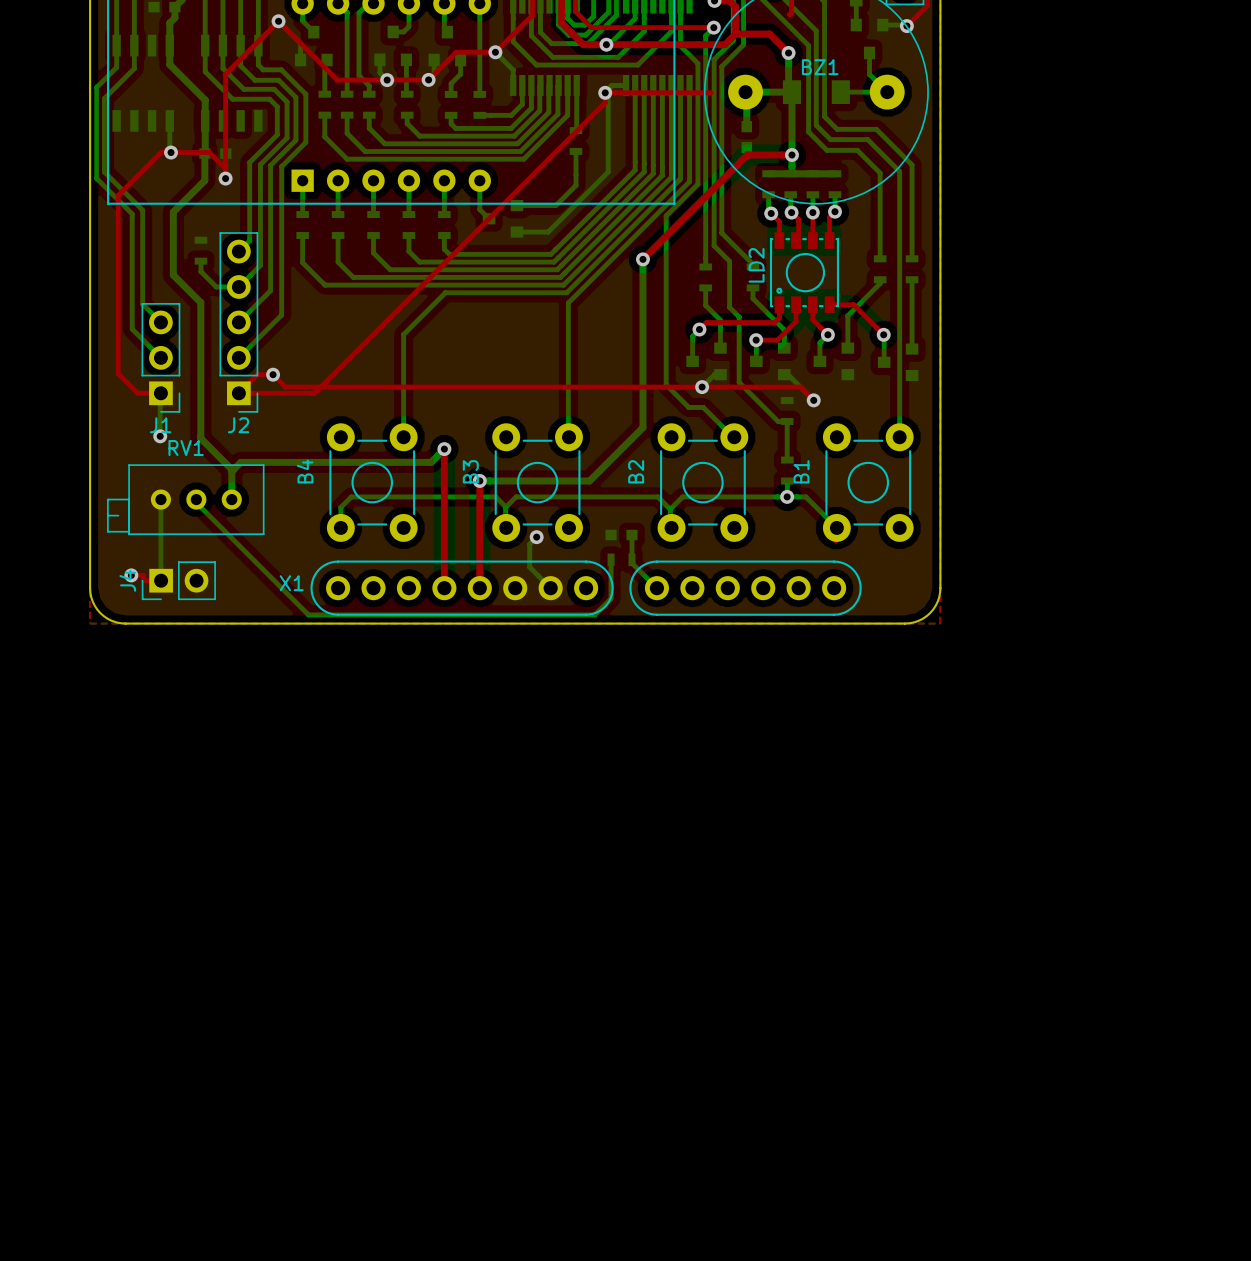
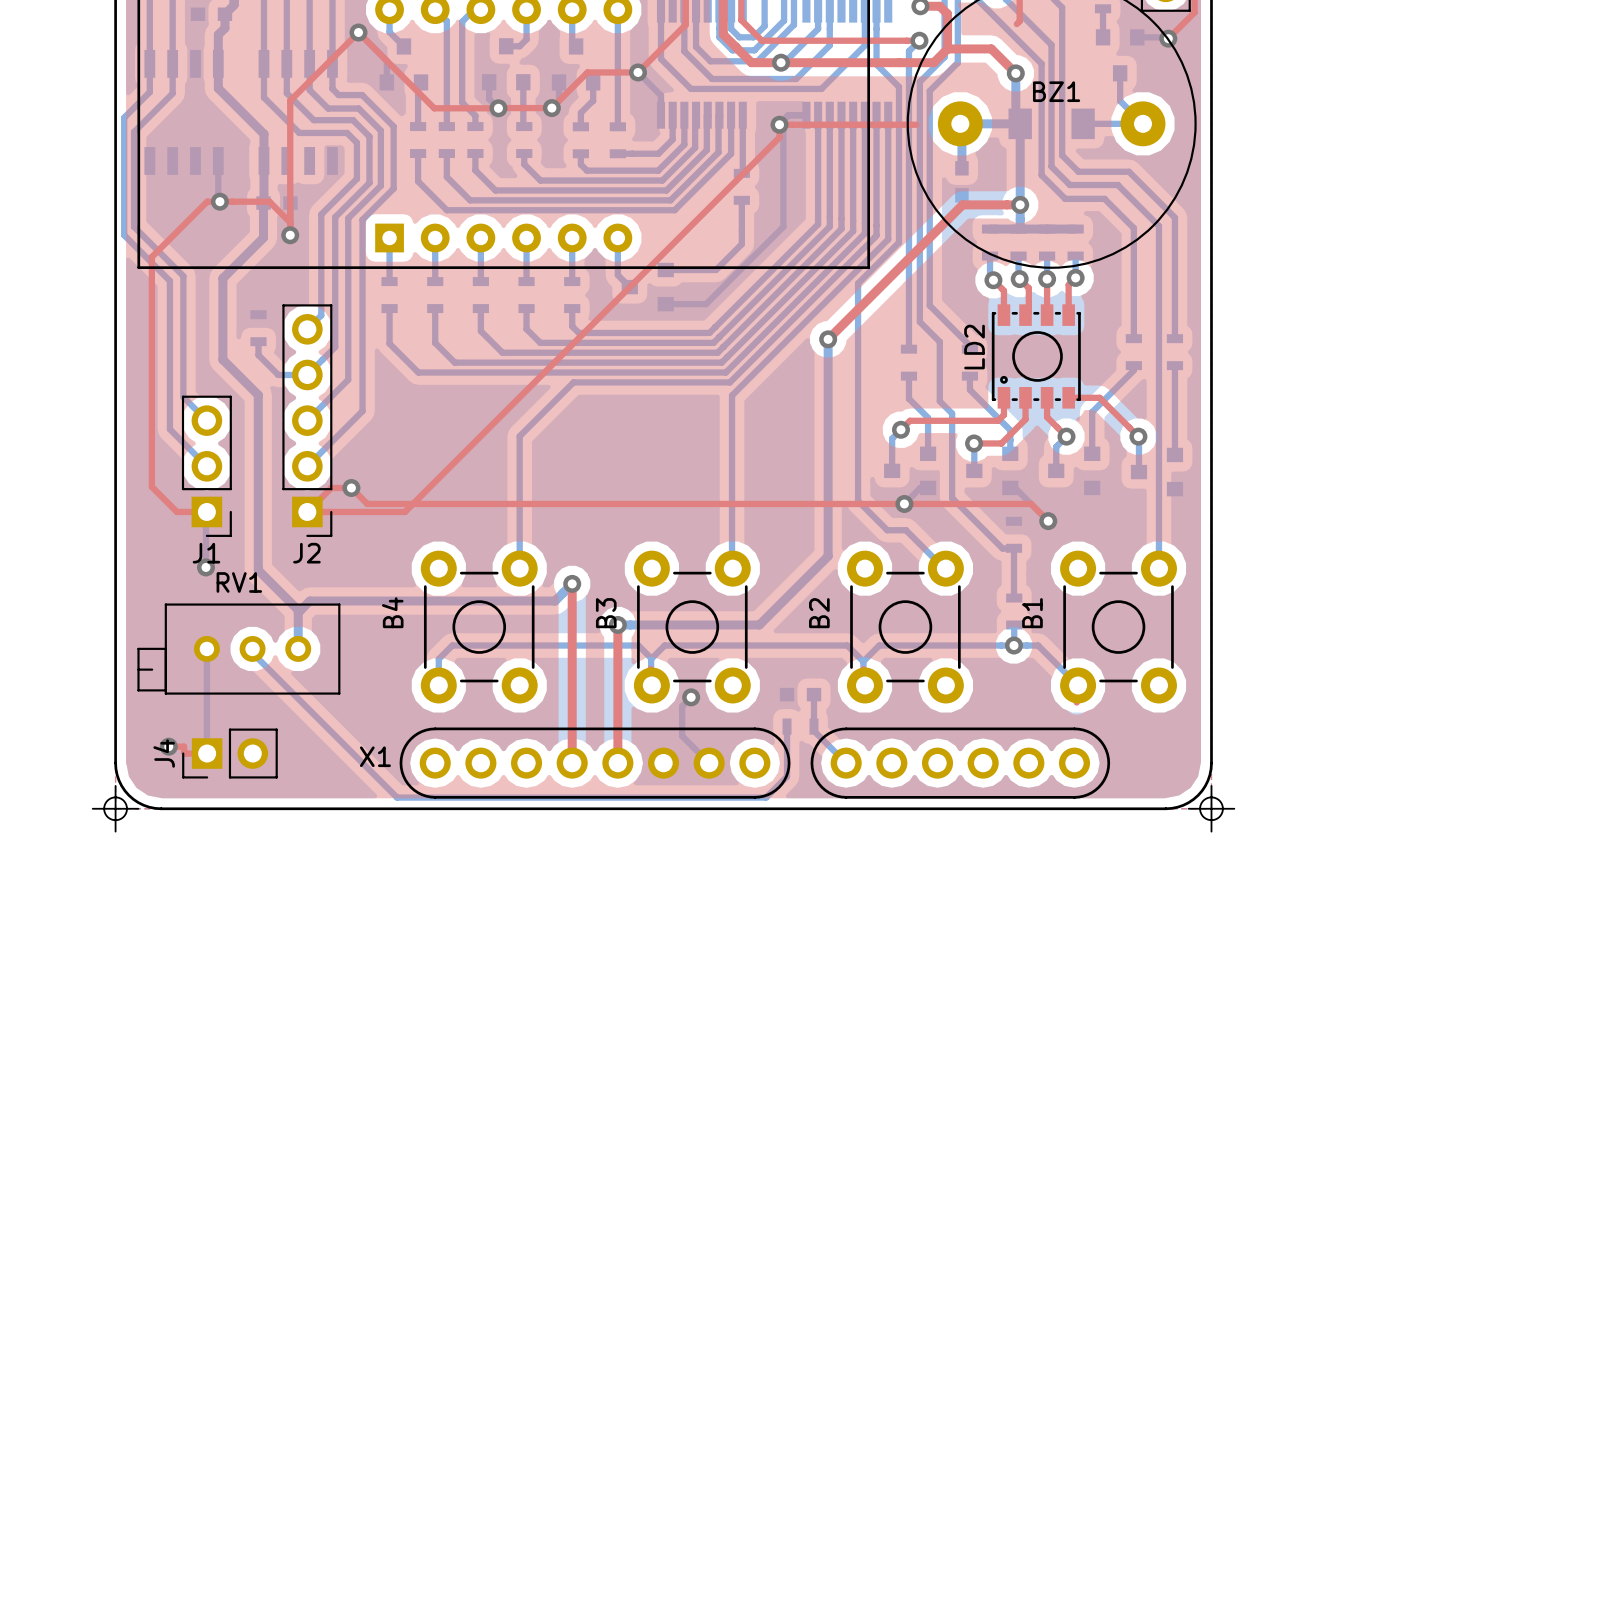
board edge: none -> (115, 785) (115, 831)
board edge: none -> (1211, 785) (1211, 831)
round board edge: none -> [103, 796, 128, 822]
round board edge: none -> [1199, 796, 1224, 822]
board edge: none -> (92, 808) (138, 808)
board edge: none -> (1188, 808) (1234, 808)

